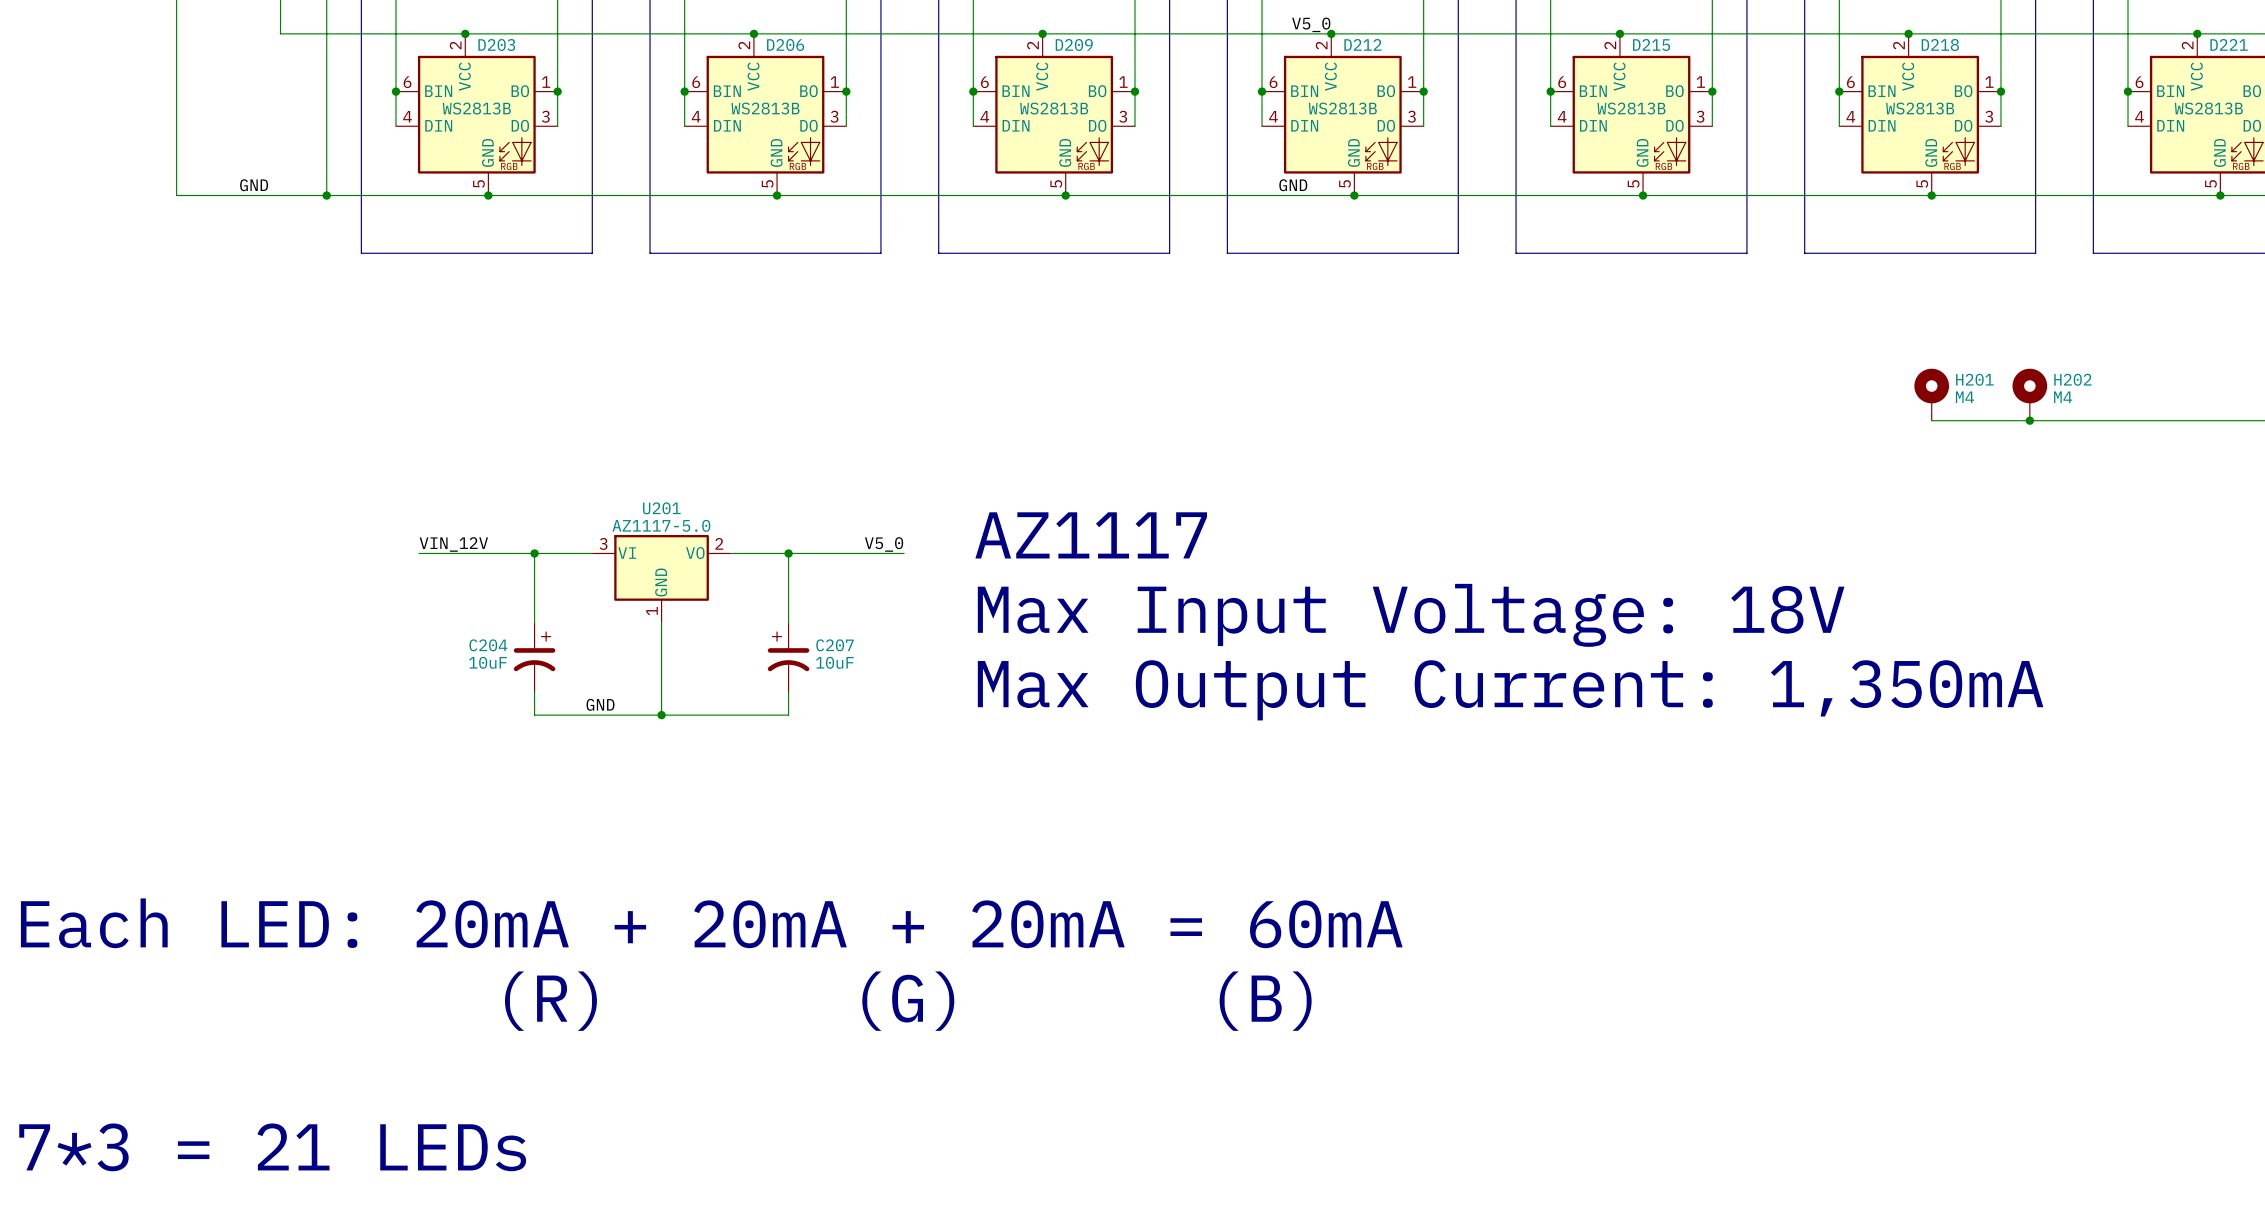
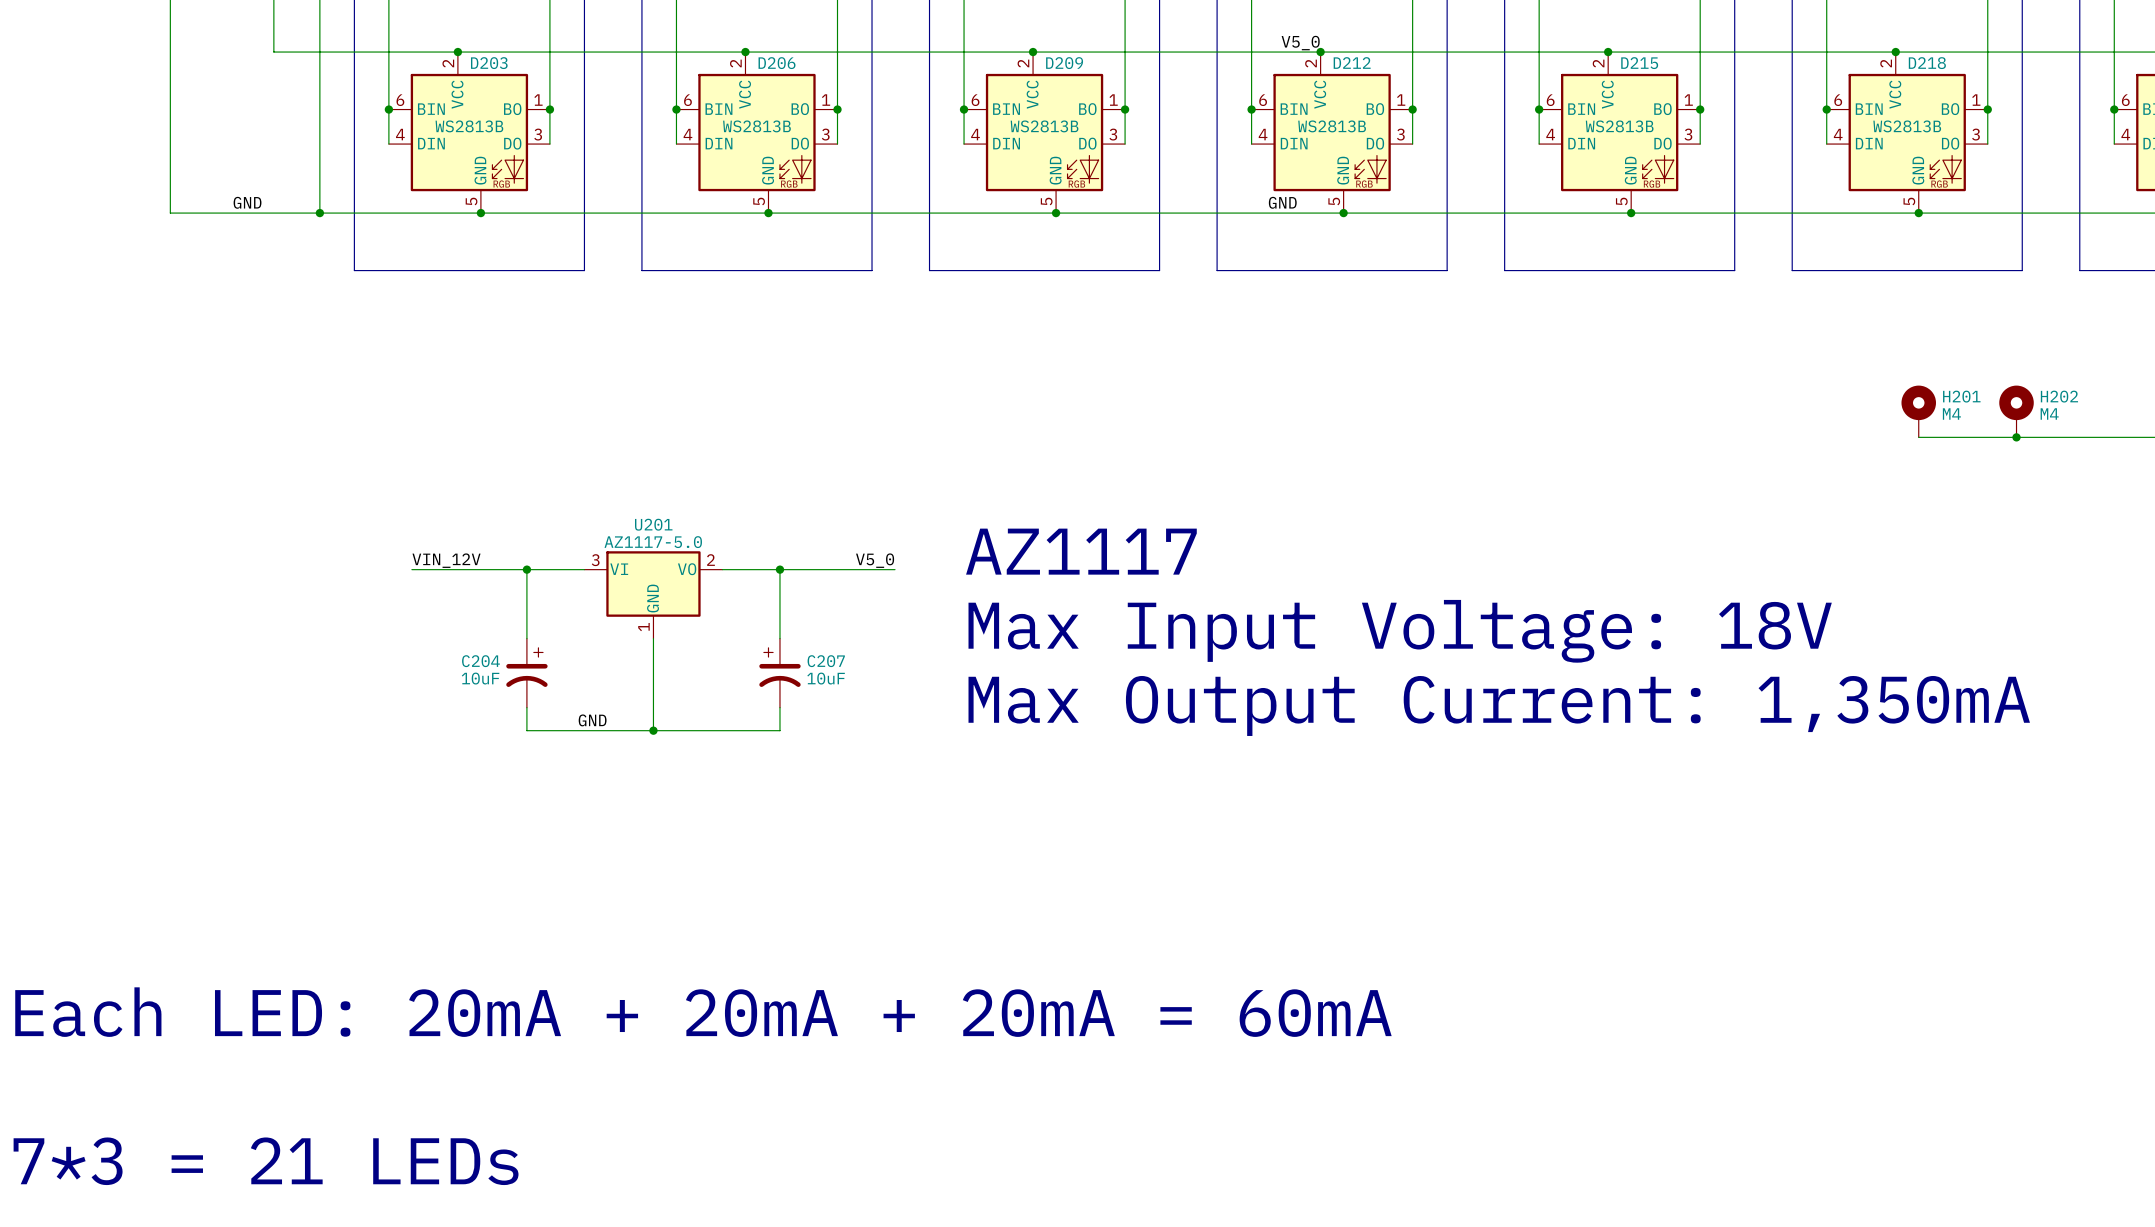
text: Each LED: 20mA + 20mA + 20mA = 60mA (711, 923) -> none
text: (R) (G) (B) (908, 1001) -> Each LED: 20mA + 20mA + 20mA = 60mA (703, 1012)

